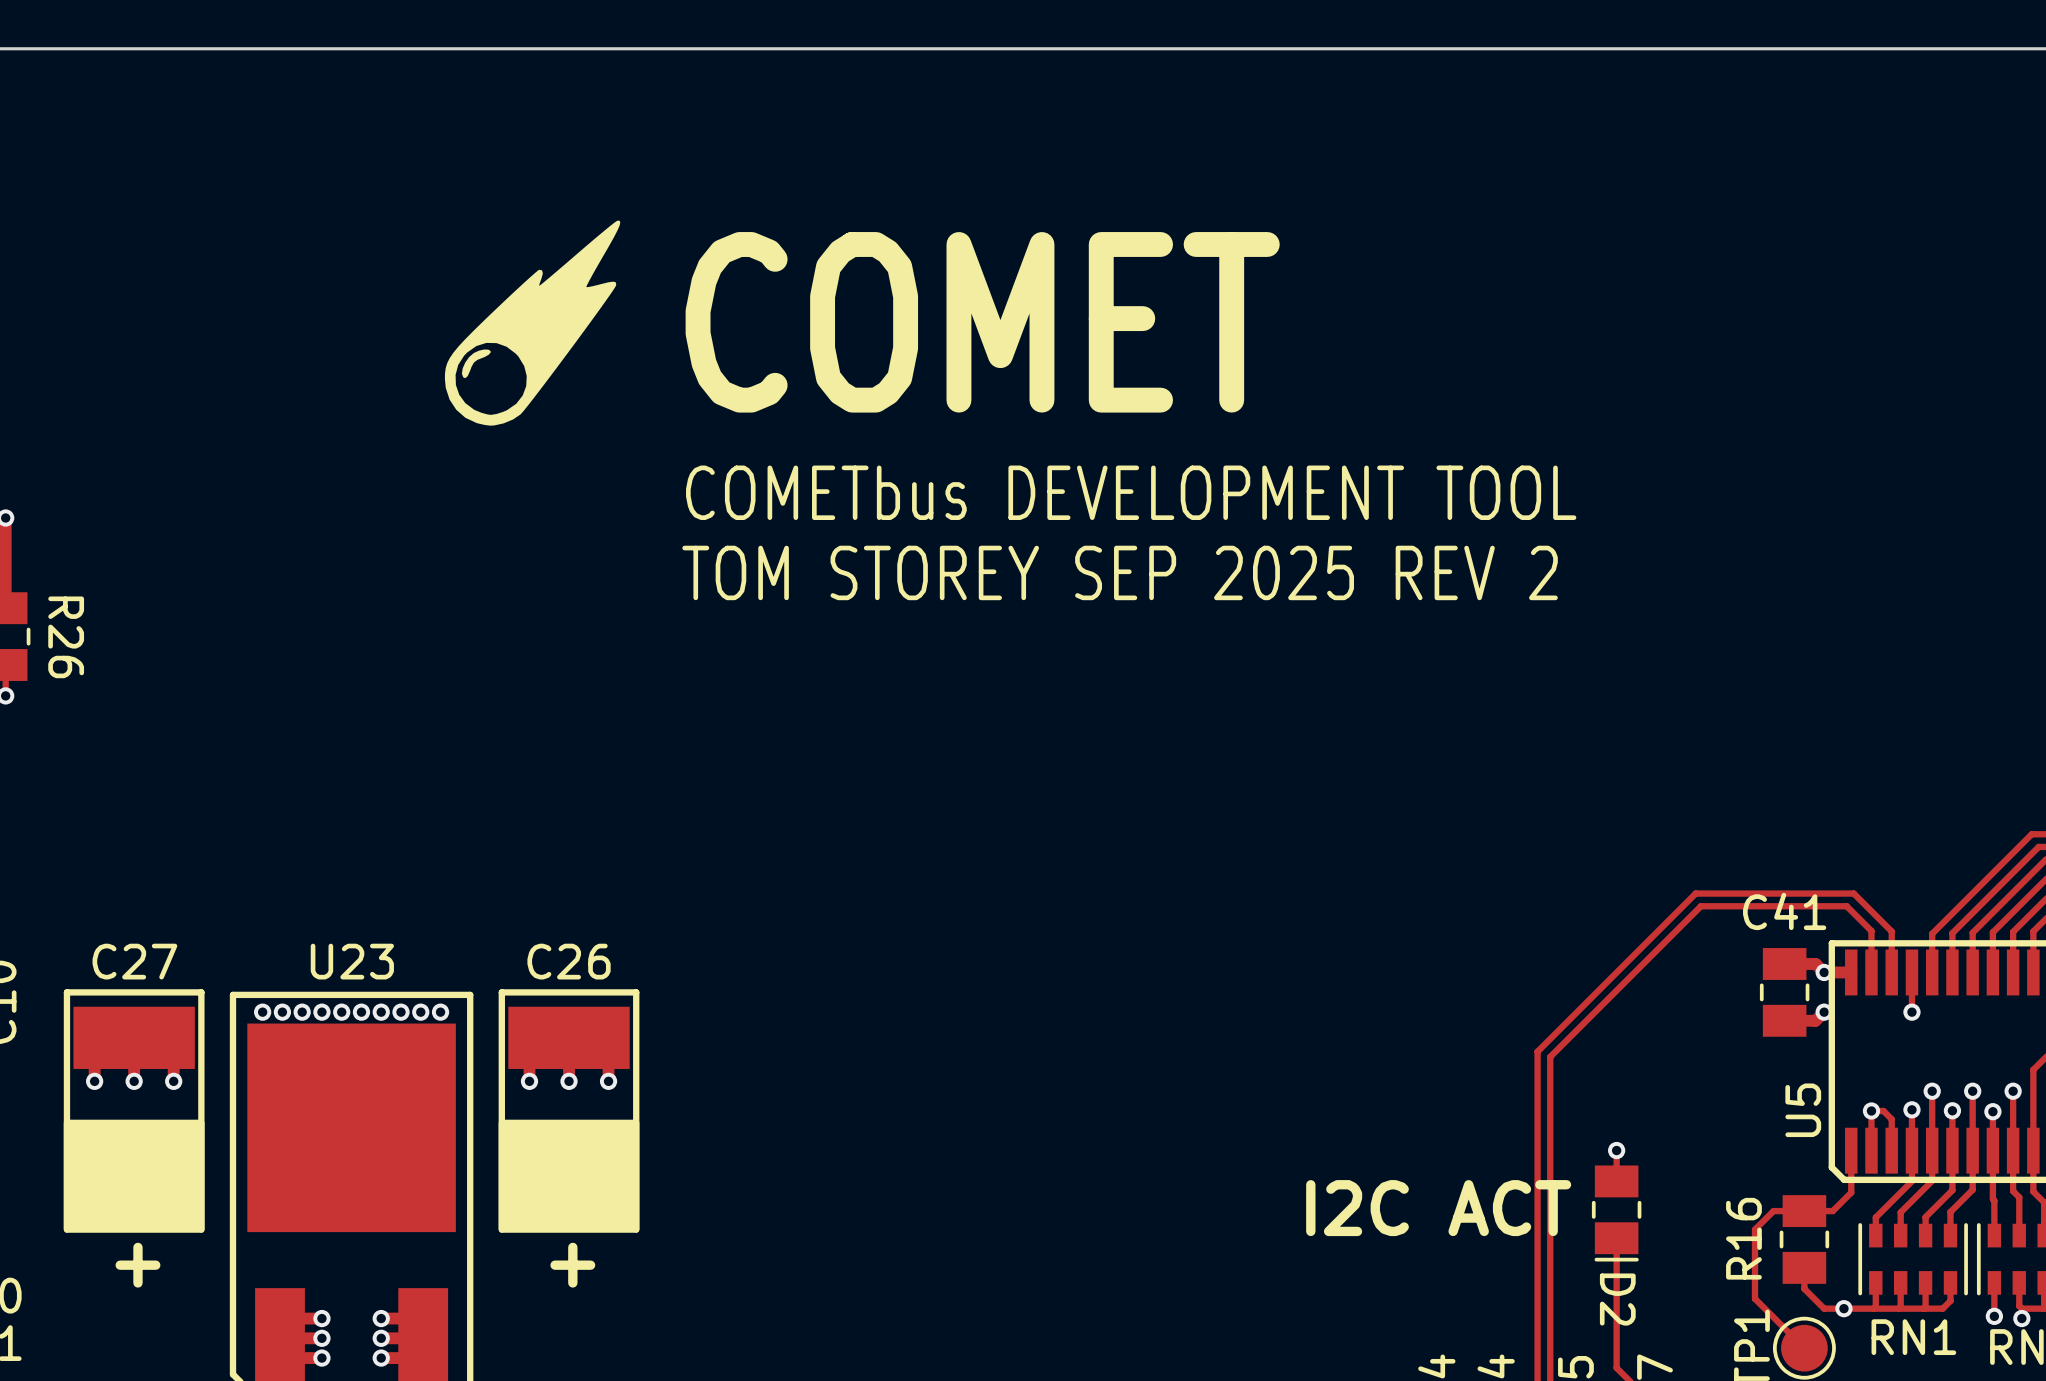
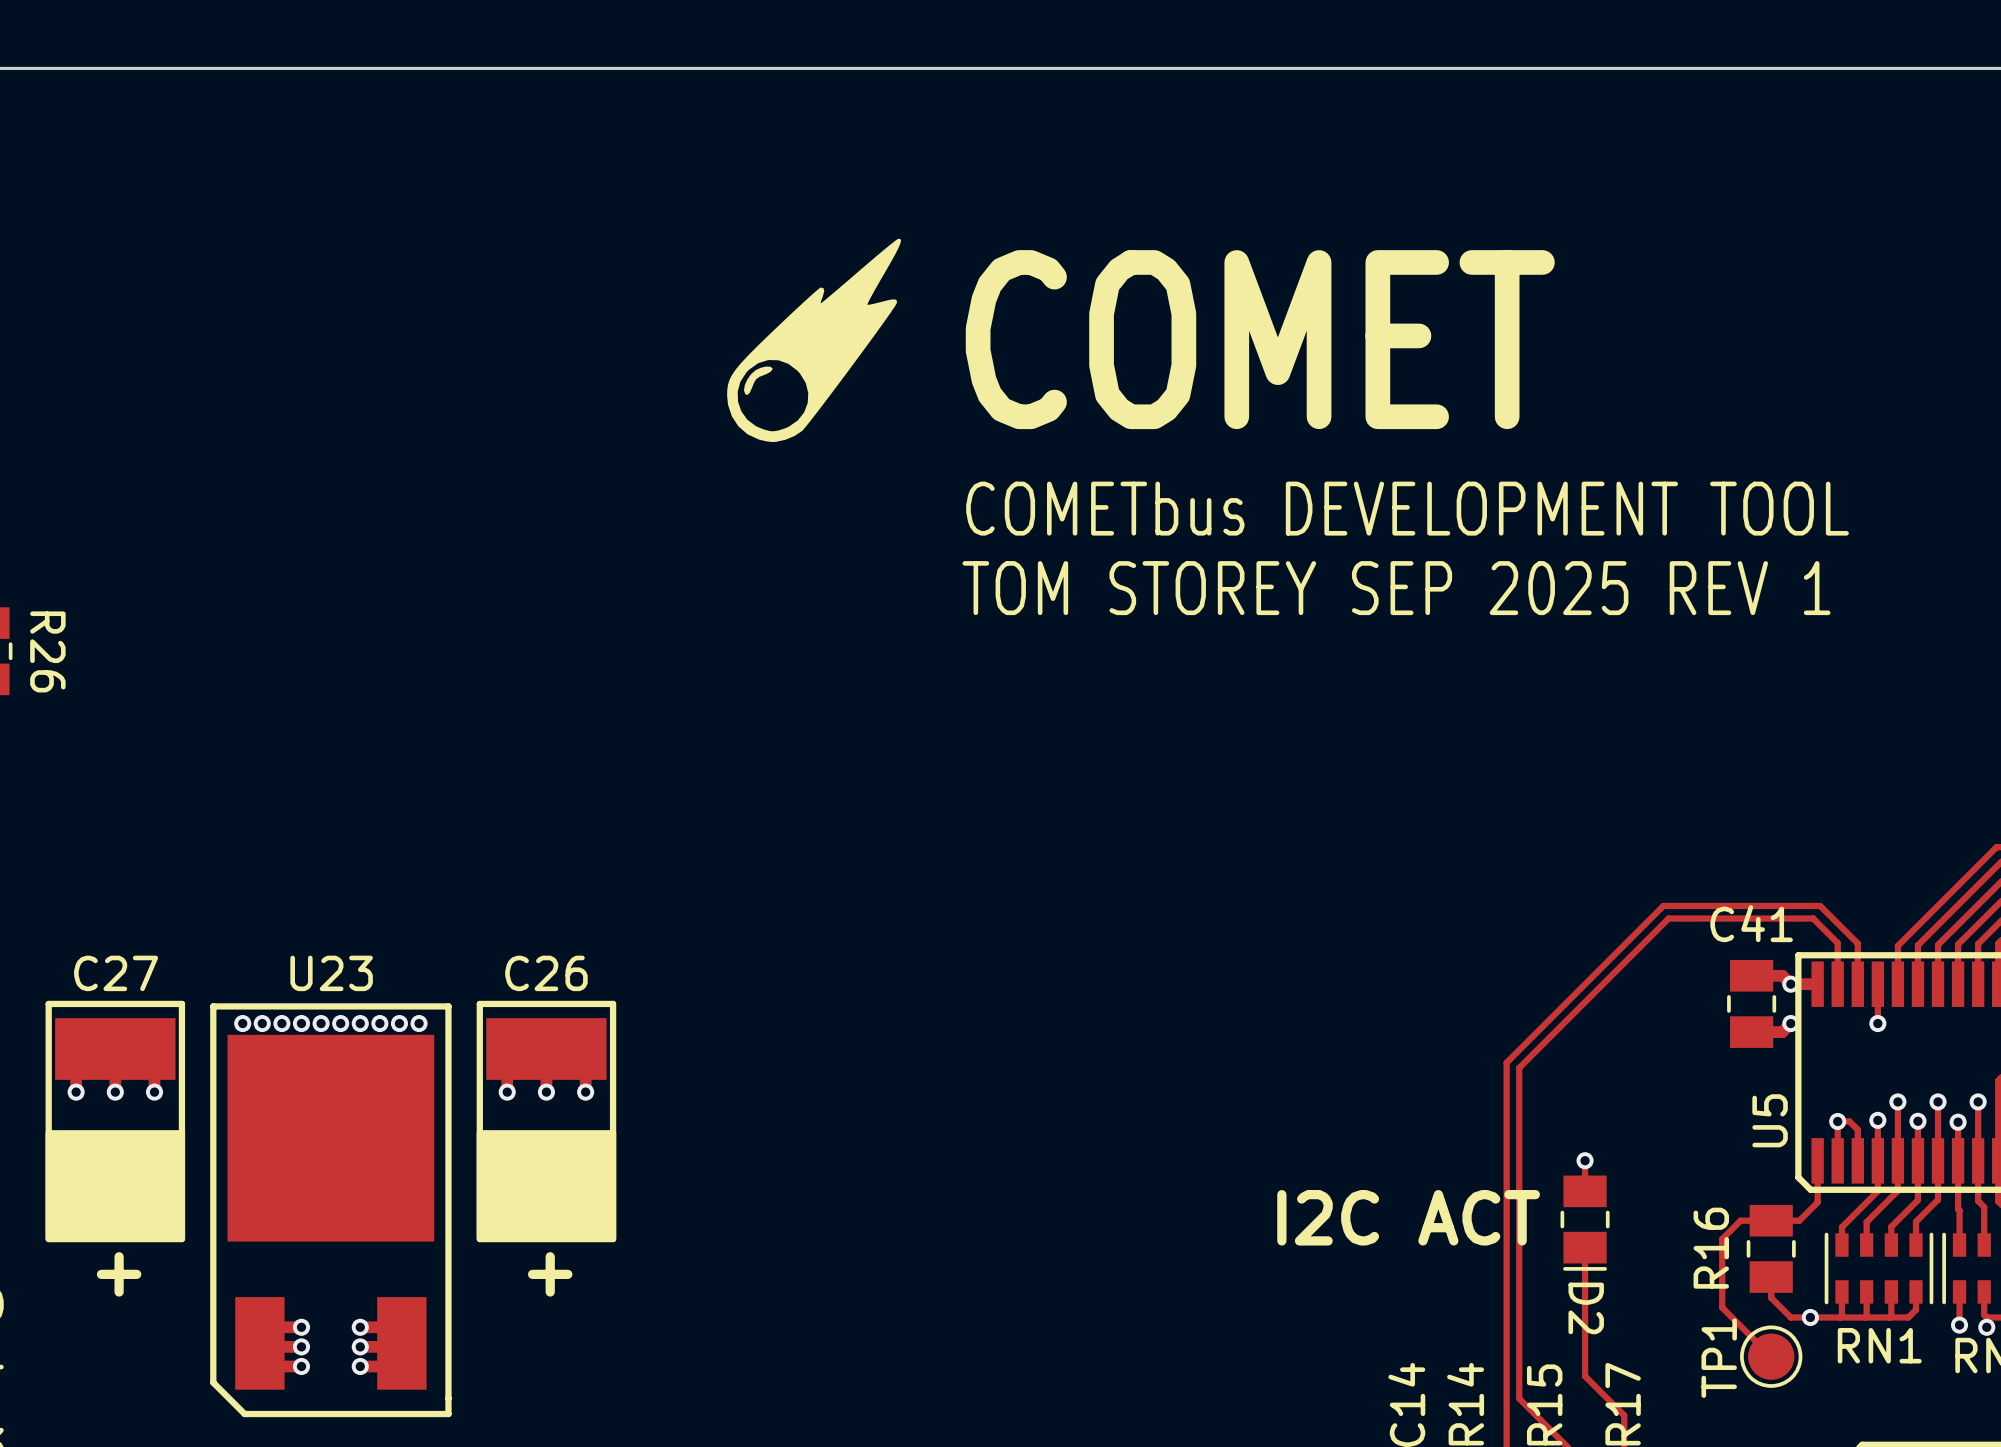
drawing position: (532, 323) -> (814, 340)
text position: COMETbus DEVELOPMENT TOOL (1131, 492) -> COMETbus DEVELOPMENT TOOL (1407, 508)
text: TOM STOREY SEP 2025 REV 2 (1120, 572) -> TOM STOREY SEP 2025 REV 1 (1396, 588)

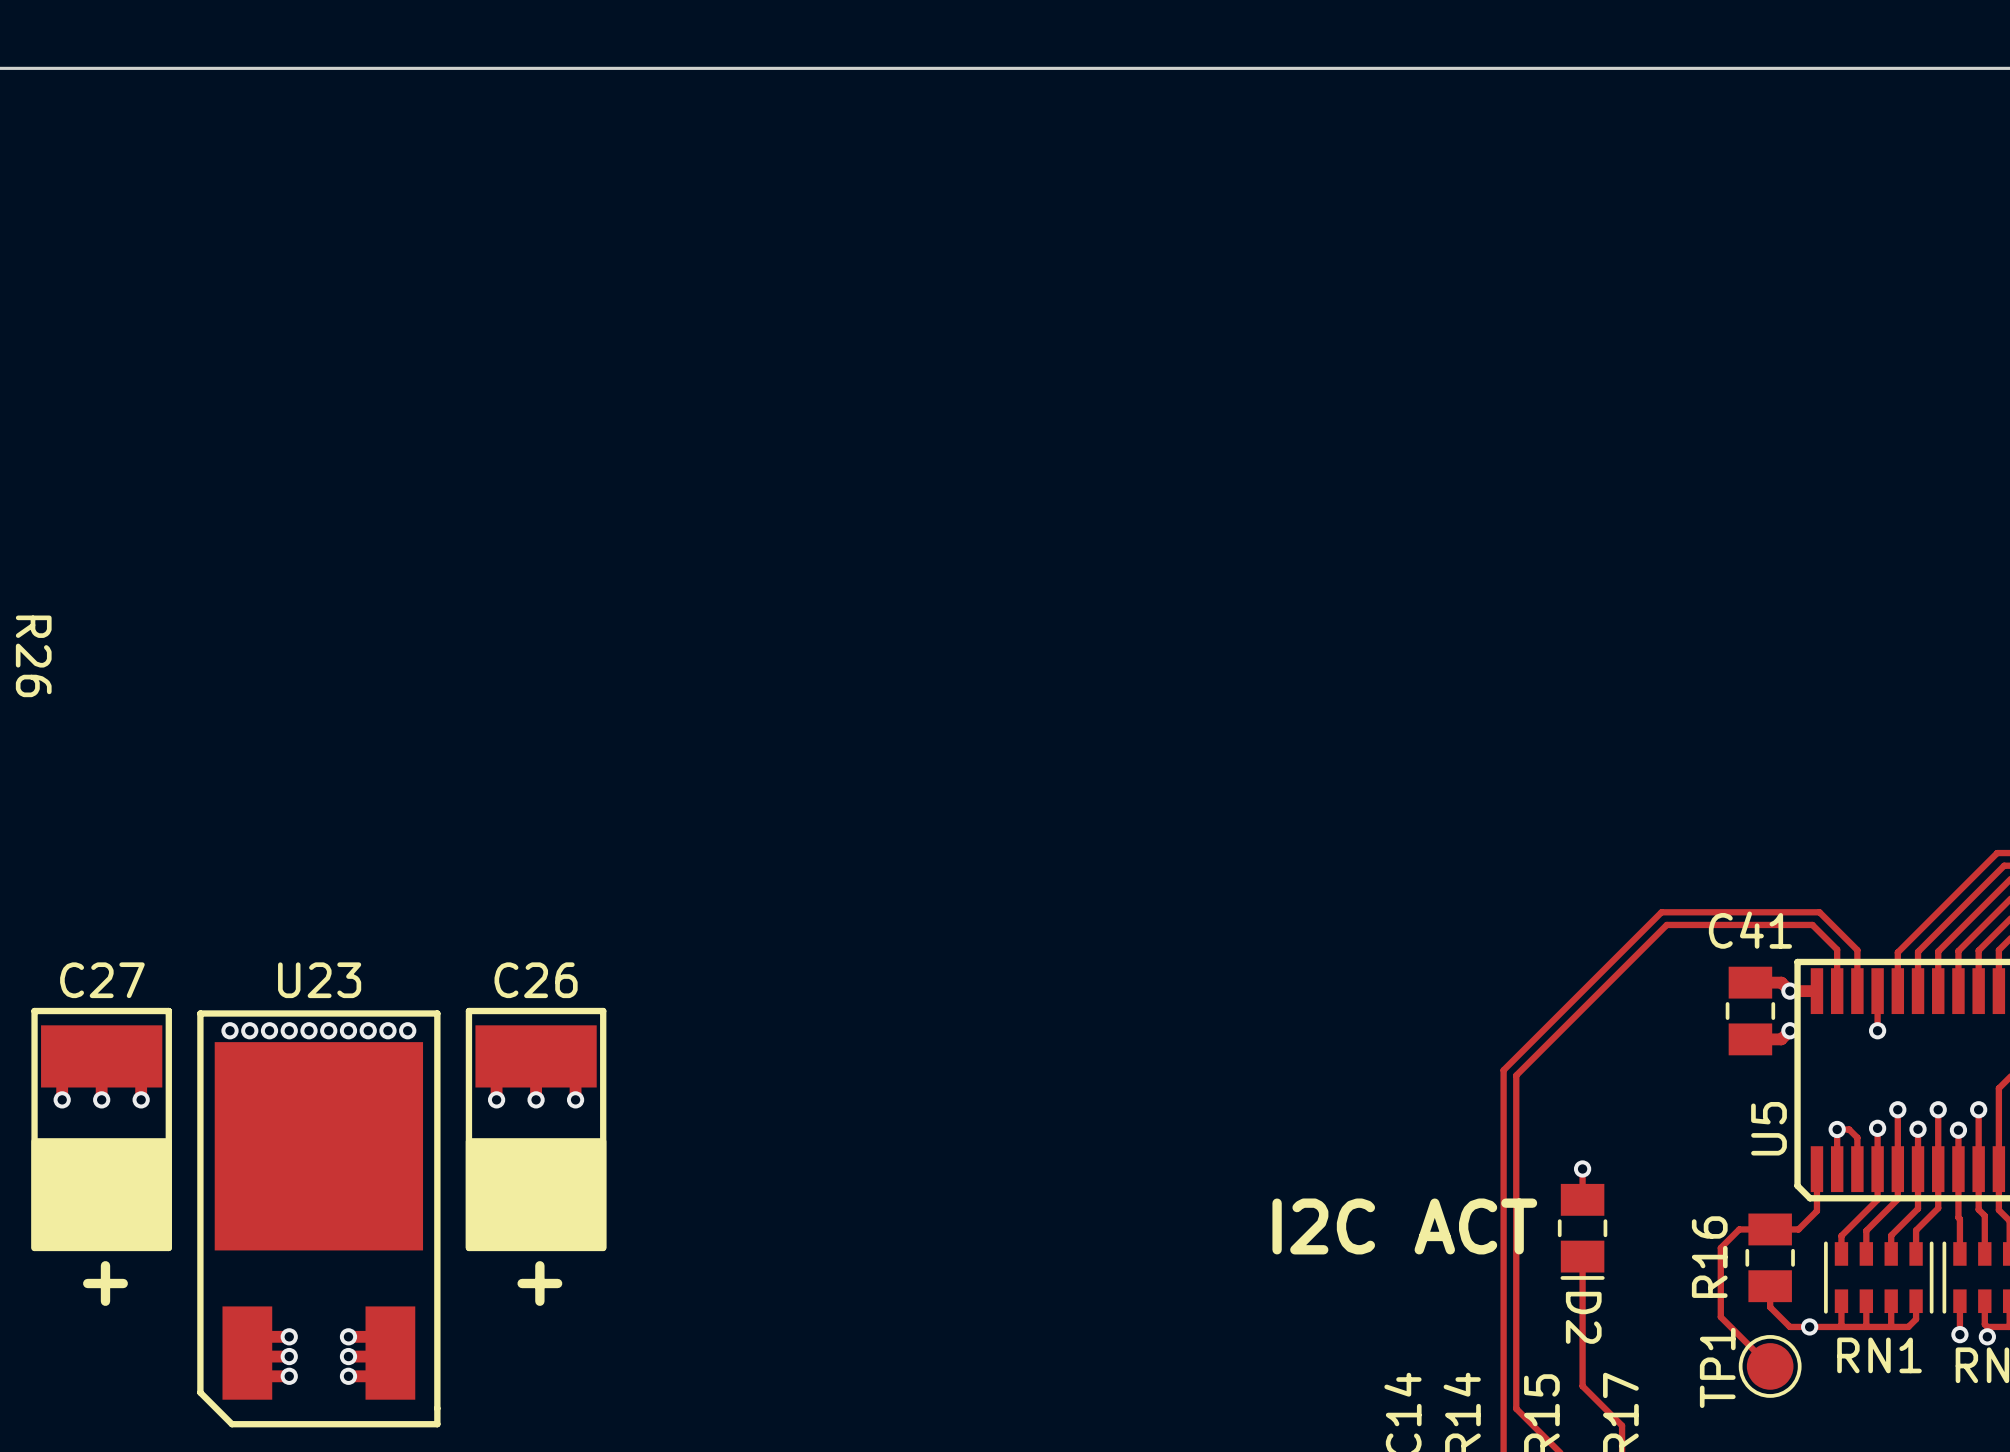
drawing: [727, 238, 902, 443] -> none
text: COMETbus DEVELOPMENT TOOL (1407, 508) -> none
text: TOM STOREY SEP 2025 REV 1 (1396, 588) -> none

